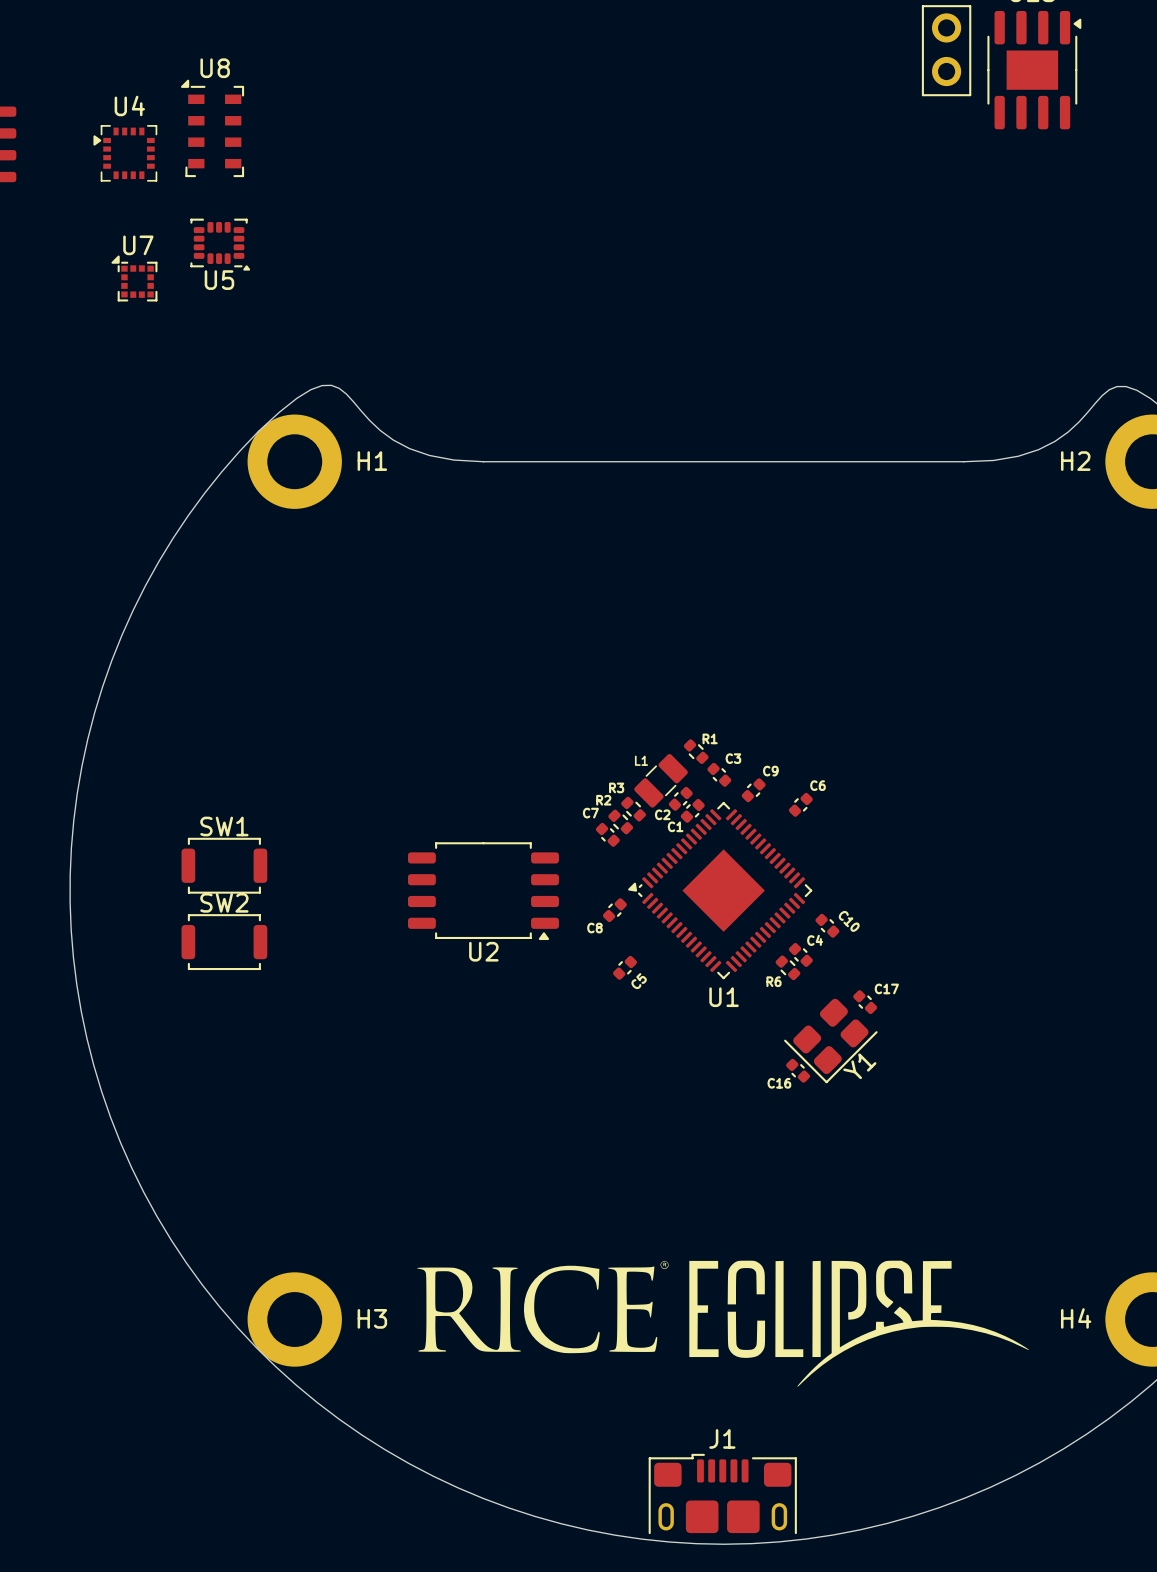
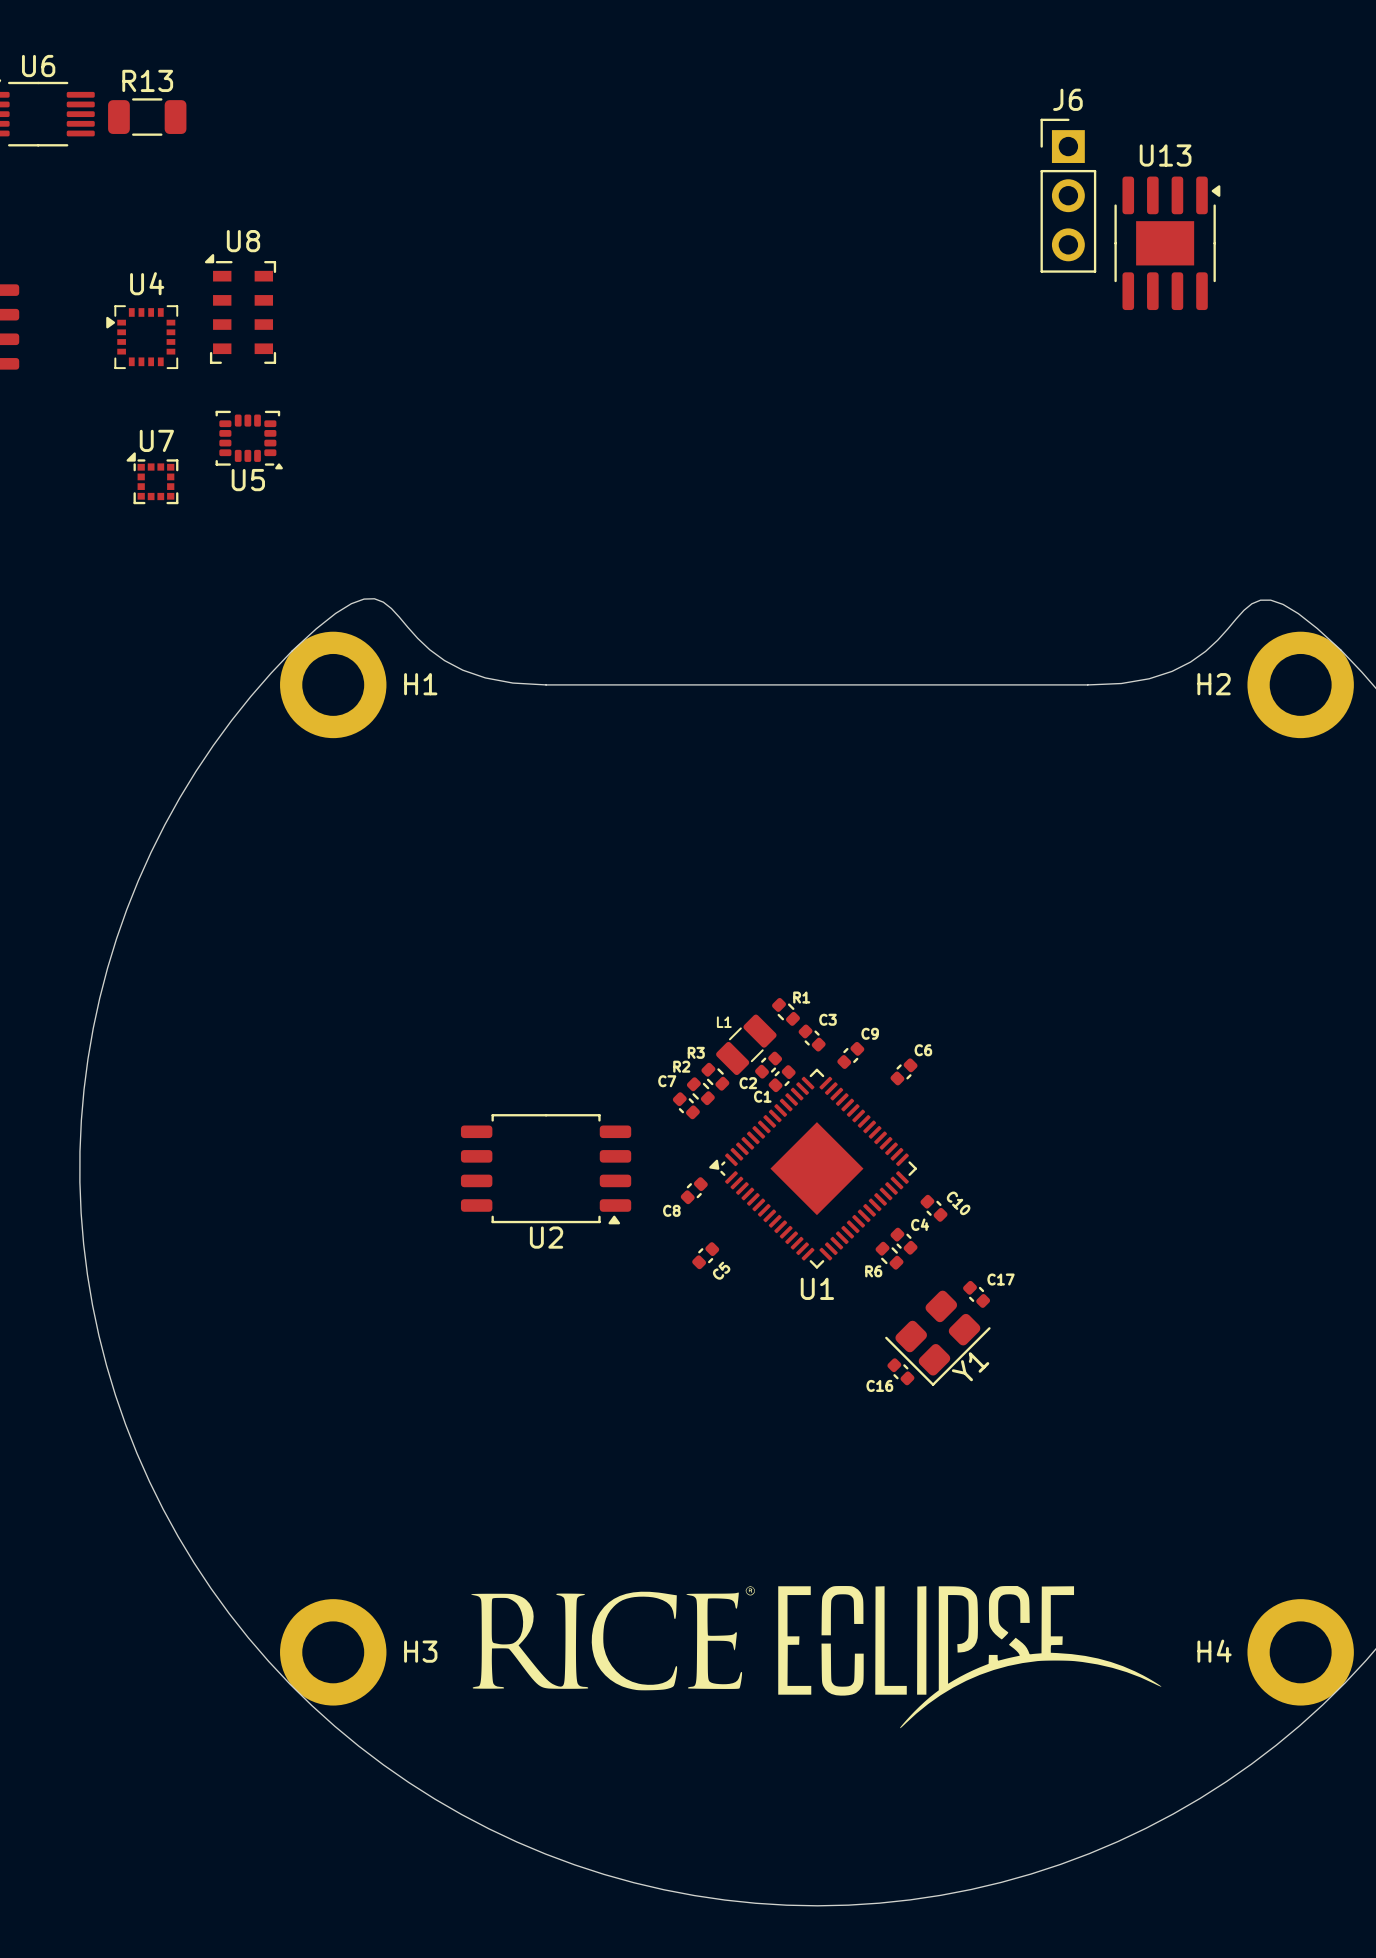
SW1: (224, 865) -> none
SW2: (224, 942) -> none
J1: (722, 1493) -> none

